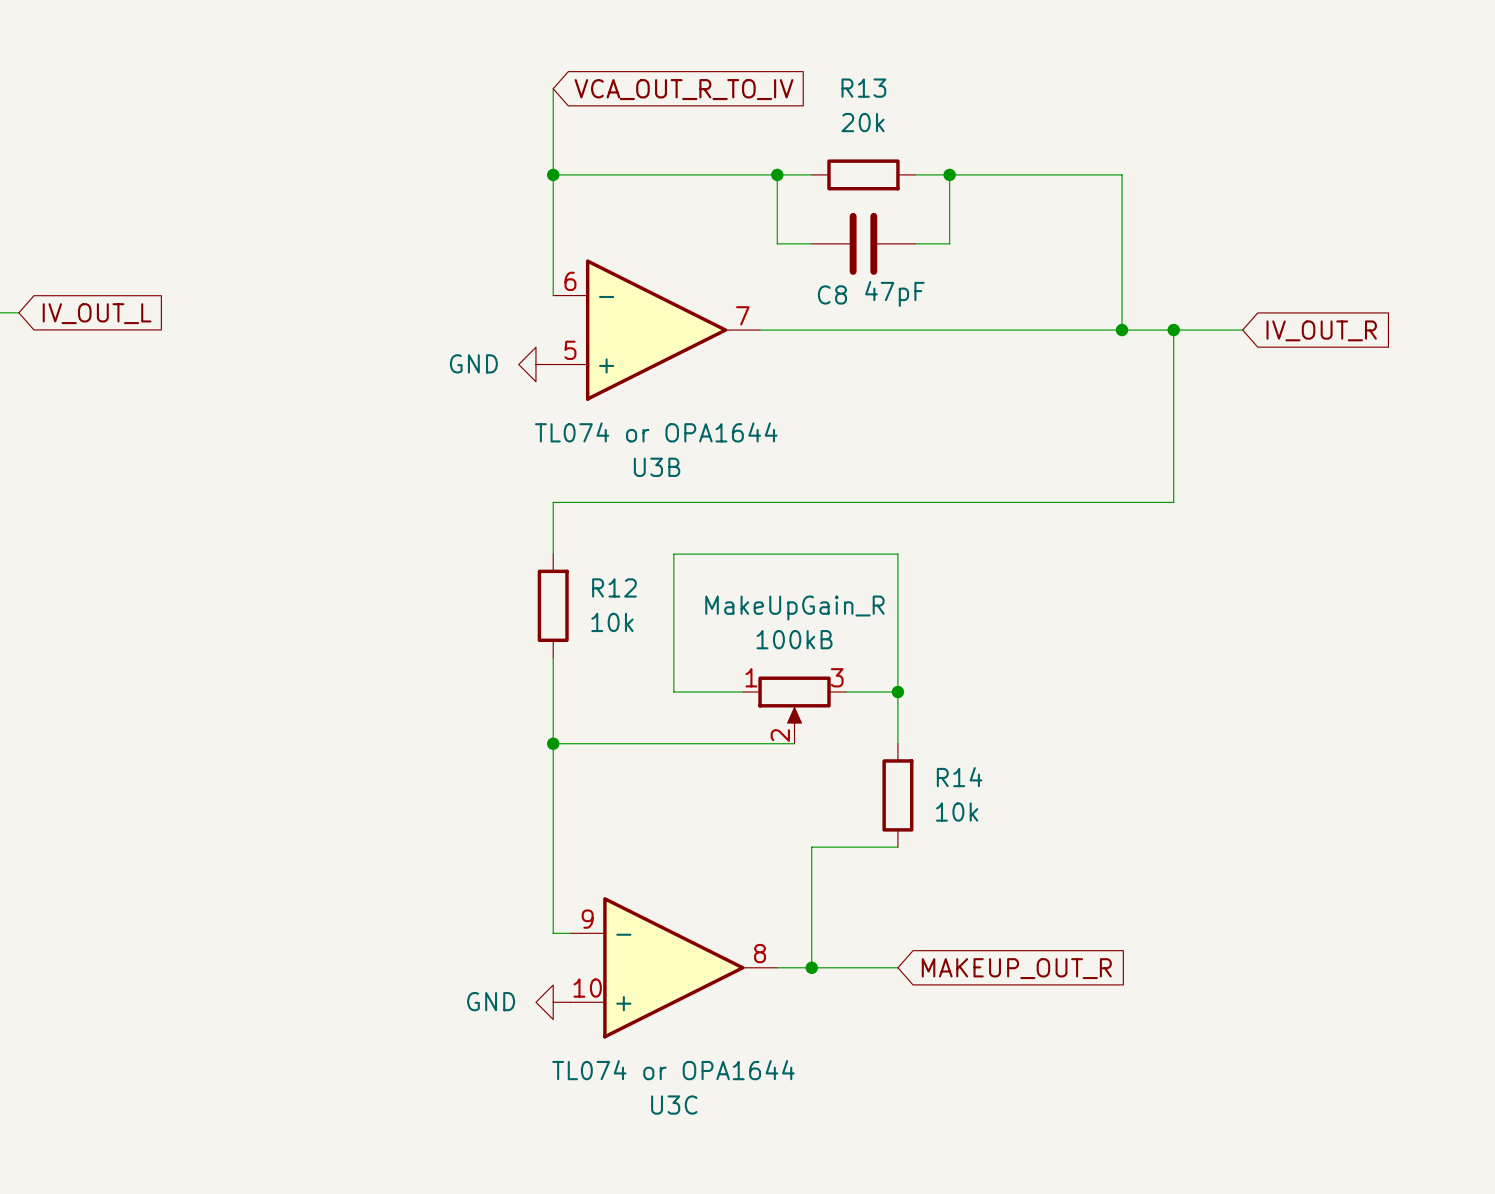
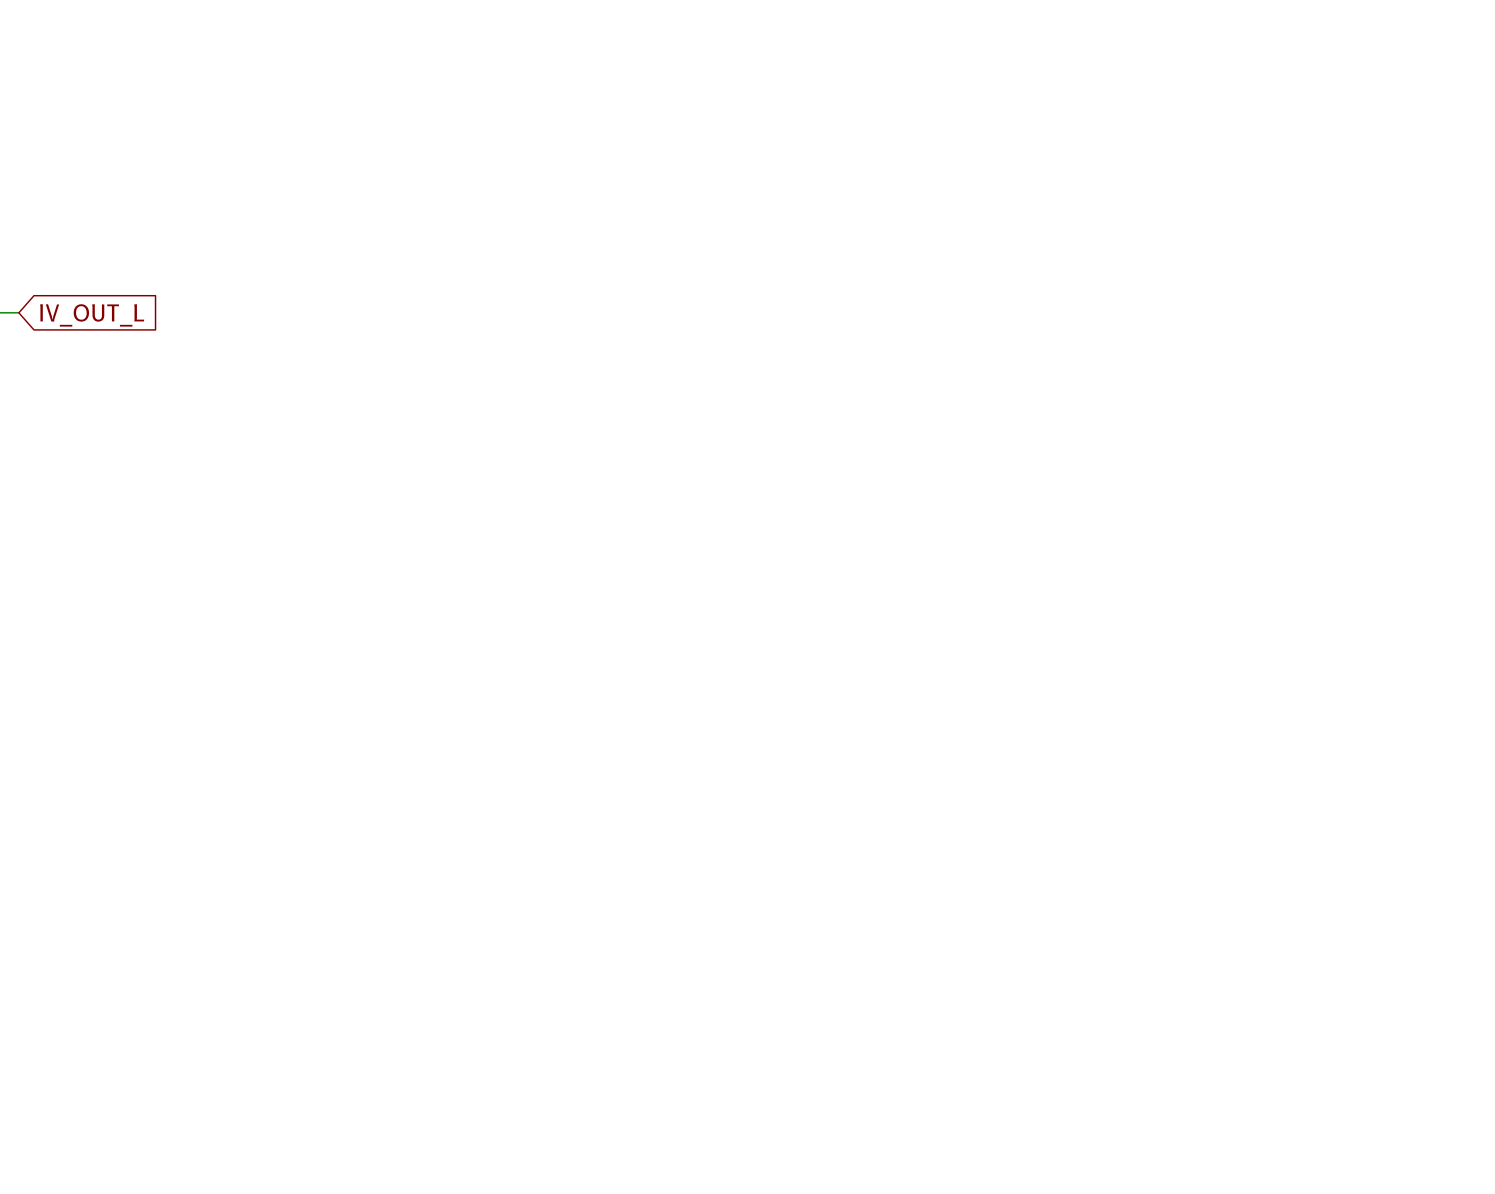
wire: (553, 88) (553, 295) -> none
global label: VCA_OUT_R_TO_IV (684, 89) -> none
wire: (553, 174) (811, 174) -> none
junction: (553, 174) -> none
wire: (777, 174) (777, 243) (811, 243) -> none
junction: (777, 174) -> none
R13: 20k (863, 174) -> none
wire: (915, 174) (1122, 174) (1122, 330) -> none
wire: (949, 174) (949, 243) (915, 243) -> none
junction: (949, 174) -> none
C8: 47pF (863, 243) -> none
U3B: TL074 or OPA1644 (656, 330) -> none
wire: (760, 330) (1242, 330) -> none
junction: (1122, 330) -> none
wire: (1173, 330) (1173, 502) (553, 502) (553, 554) -> none
junction: (1173, 330) -> none
global label: IV_OUT_R (1321, 330) -> none
power symbol: GND (535, 364) -> none
R12: 10k (553, 605) -> none
wire: (553, 657) (553, 933) (570, 933) -> none
wire: (742, 692) (673, 692) (673, 554) (897, 554) (897, 743) -> none
wire: (846, 692) (897, 692) -> none
junction: (897, 692) -> none
MakeUpGain_R: 100kB (794, 710) -> none
wire: (553, 743) (794, 743) -> none
junction: (553, 743) -> none
R14: 10k (897, 795) -> none
wire: (897, 847) (811, 847) (811, 967) -> none
U3C: TL074 or OPA1644 (673, 967) -> none
wire: (777, 967) (897, 967) -> none
junction: (811, 967) -> none
global label: MAKEUP_OUT_R (1016, 968) -> none
power symbol: GND (553, 1002) -> none

